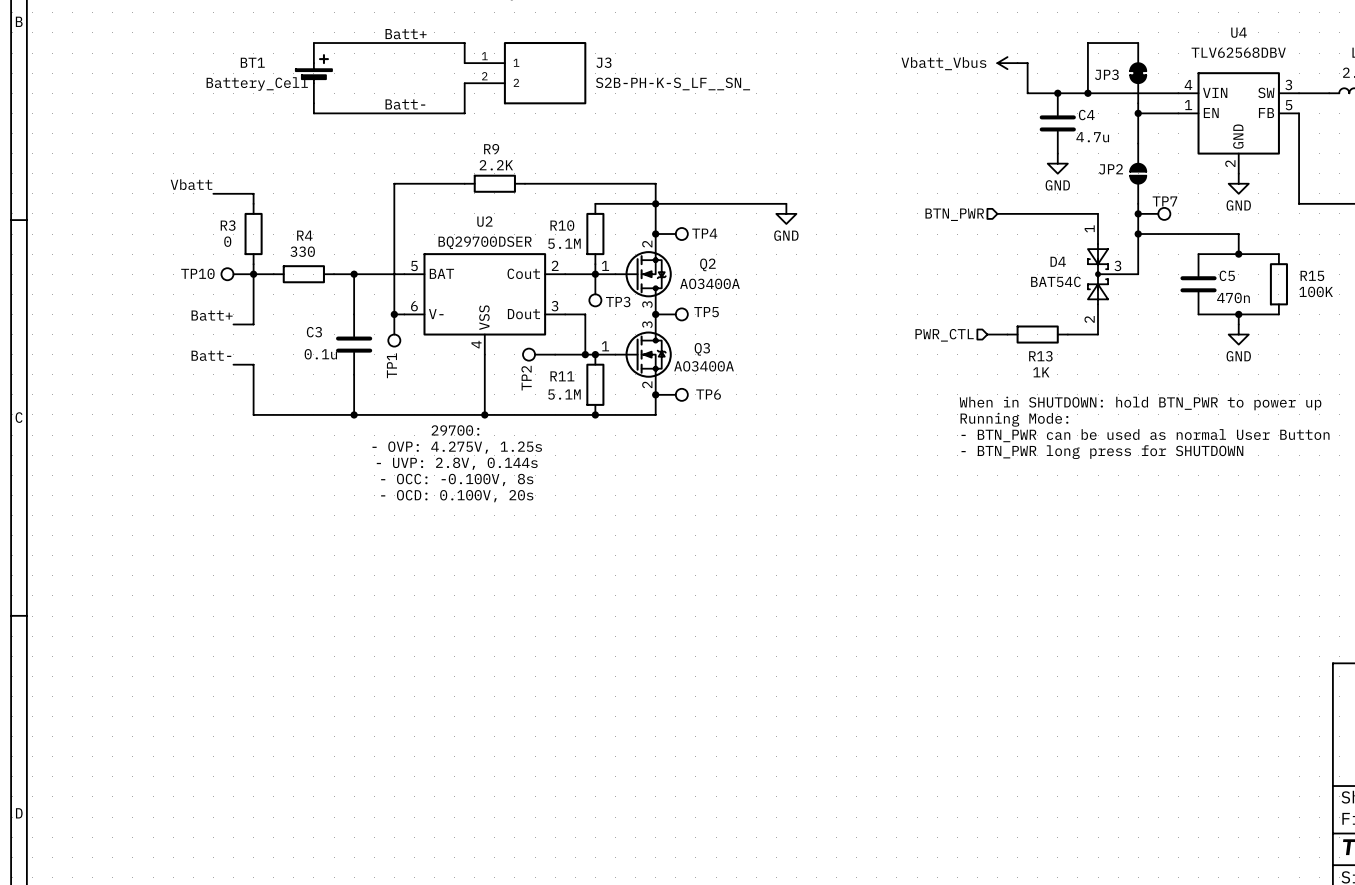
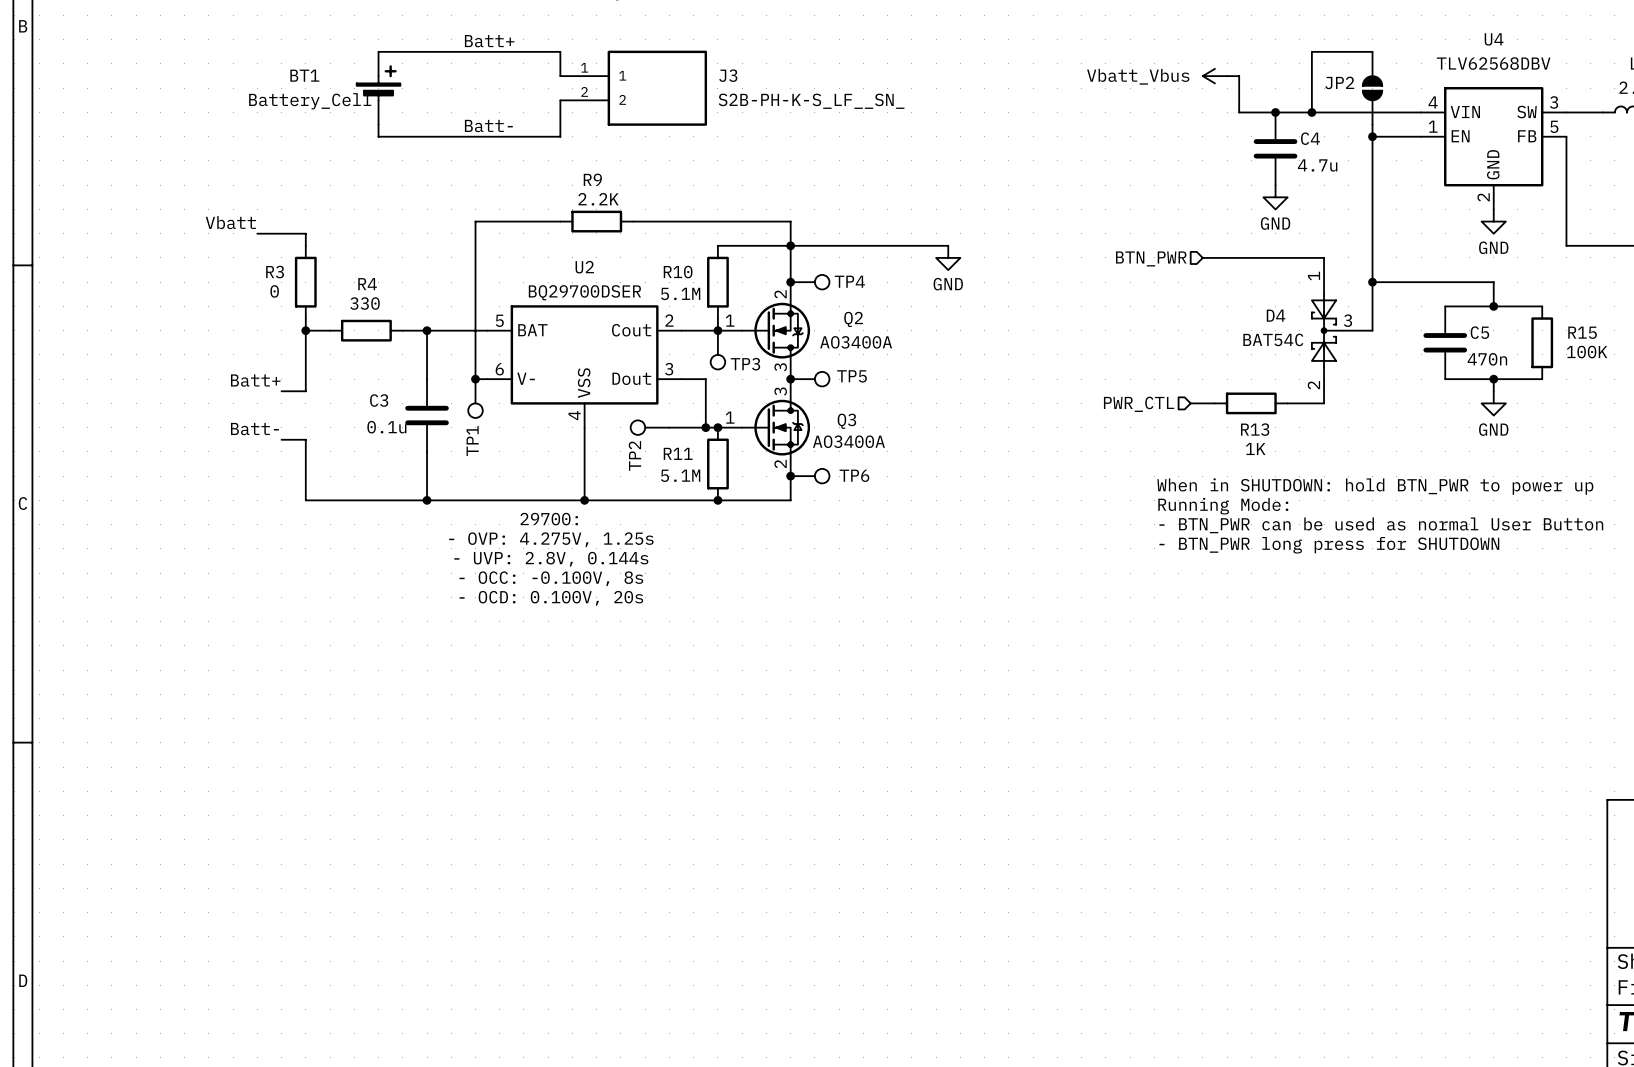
JP3: (1138, 73) -> none
JP2 position: (1138, 173) -> (1372, 88)
junction: (1138, 213) -> none
TP7: (1154, 213) -> none
TP10: (237, 274) -> none

